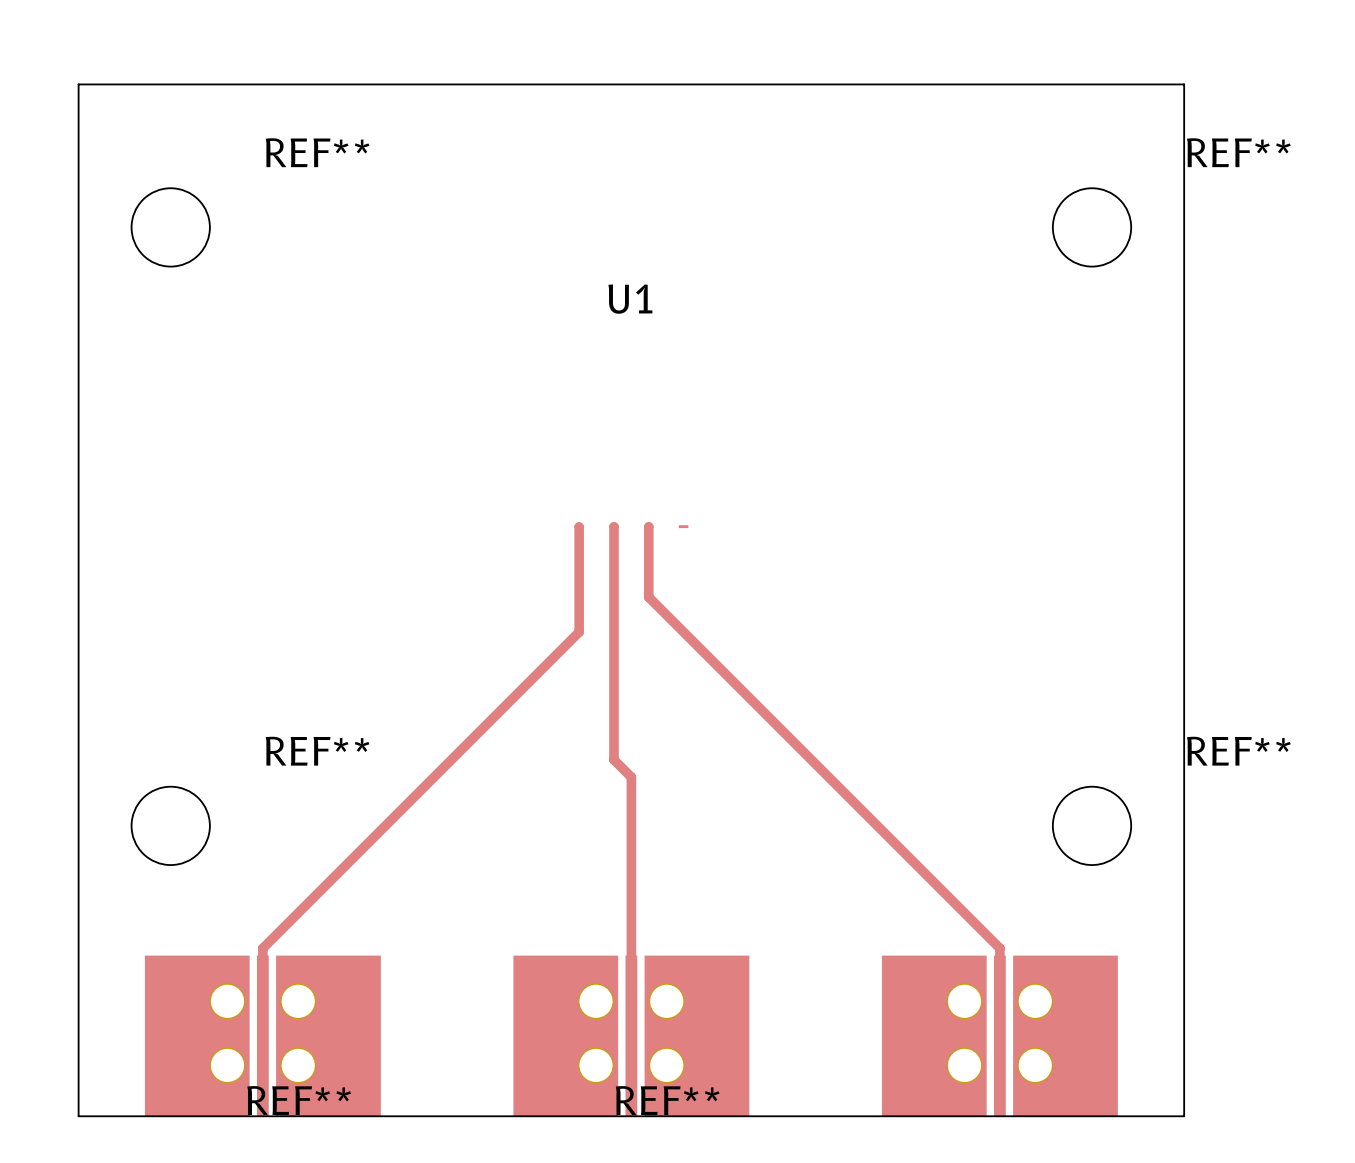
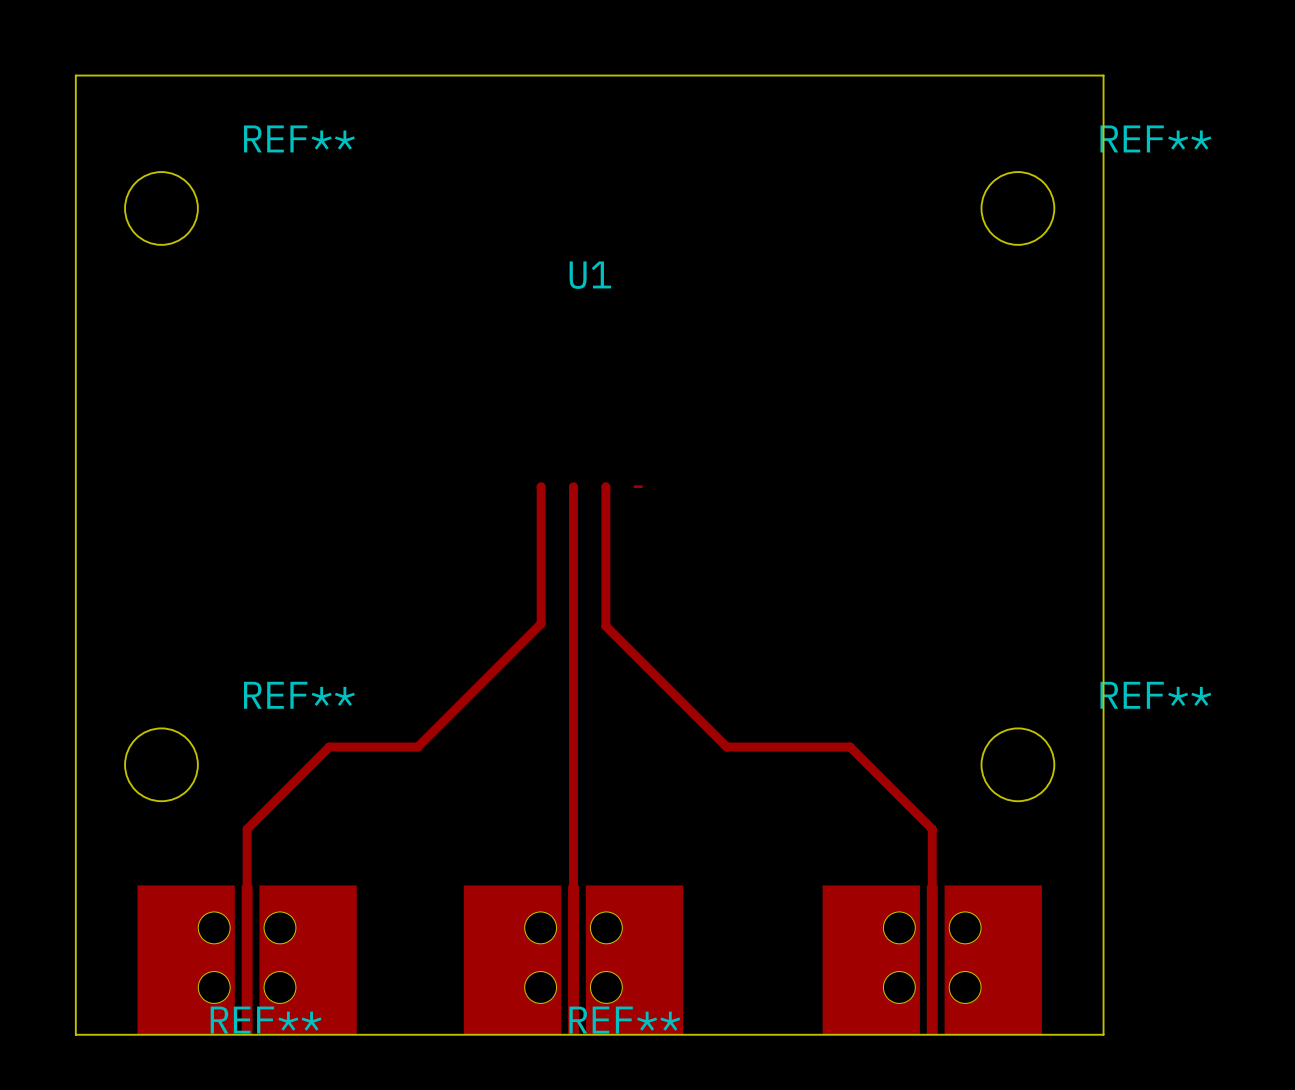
track: (648, 597) (999, 948) -> (605, 552) (605, 626) (726, 746) (850, 746) (932, 829) (932, 878)
track: (579, 632) (262, 948) -> (541, 584) (541, 623) (417, 746) (329, 746) (247, 829) (247, 878)
track: (613, 759) (631, 777) (631, 1035) -> (573, 703) (573, 960)
REF** position: (631, 1035) -> (573, 960)

